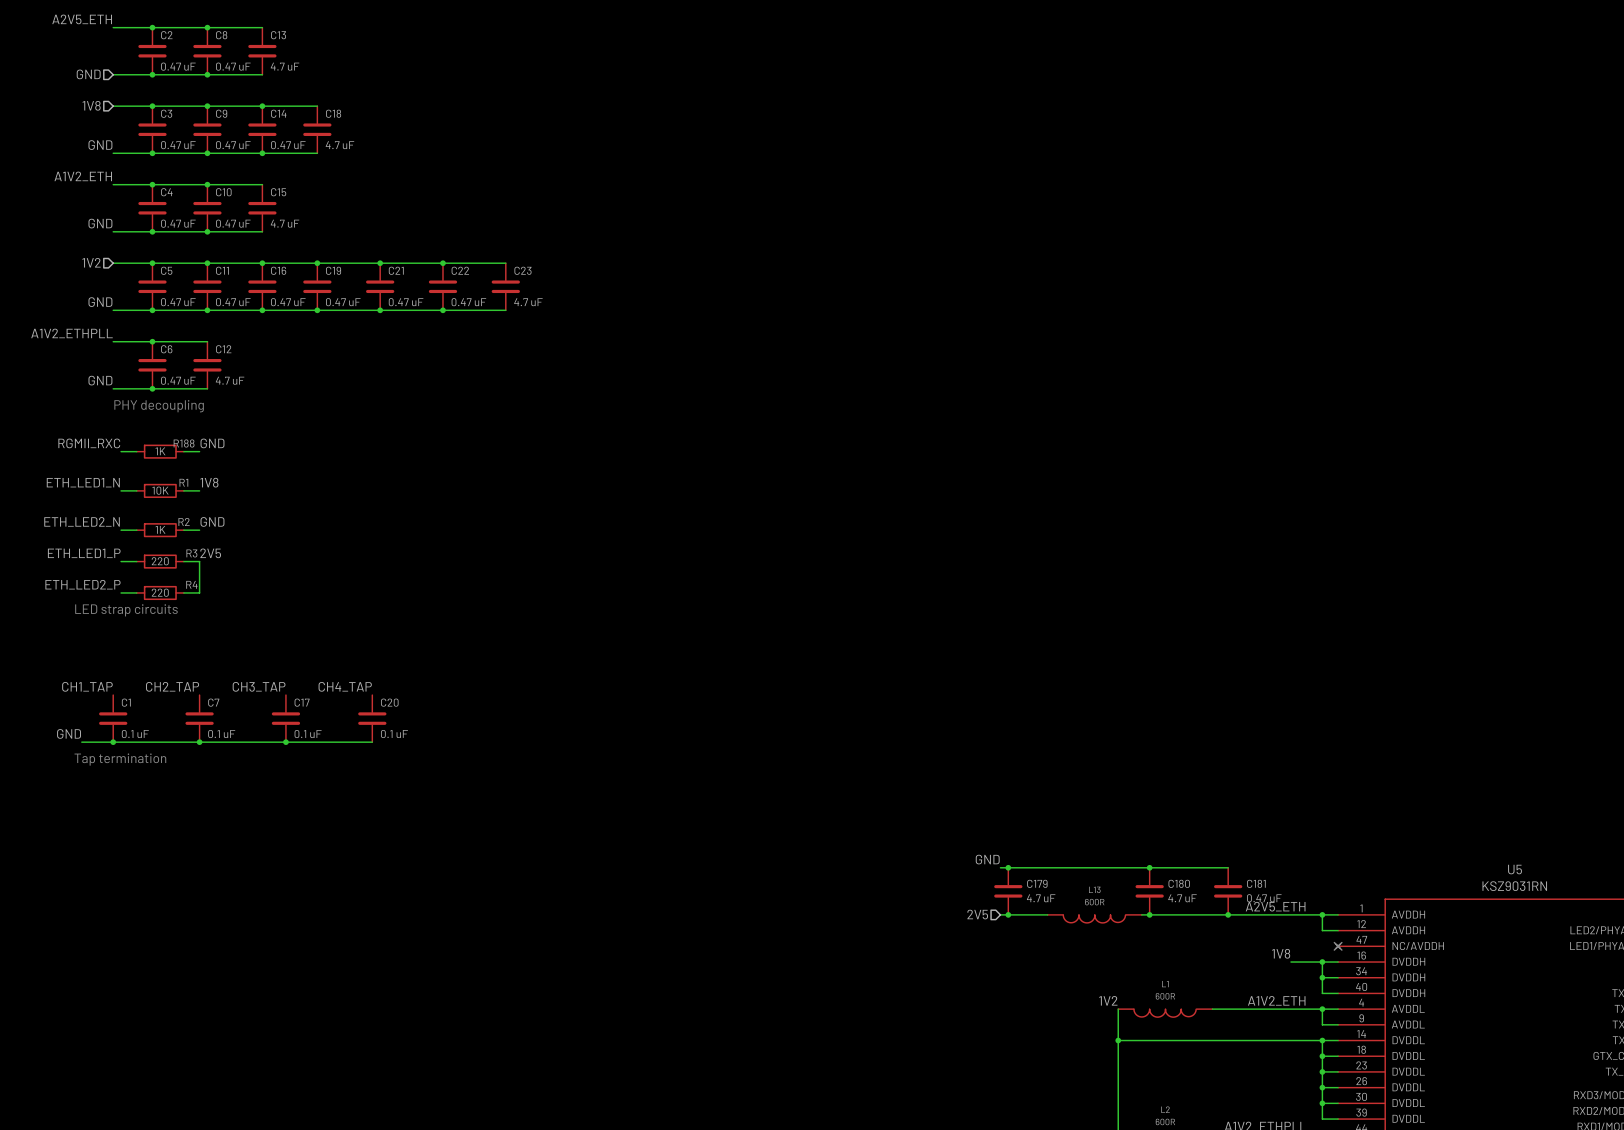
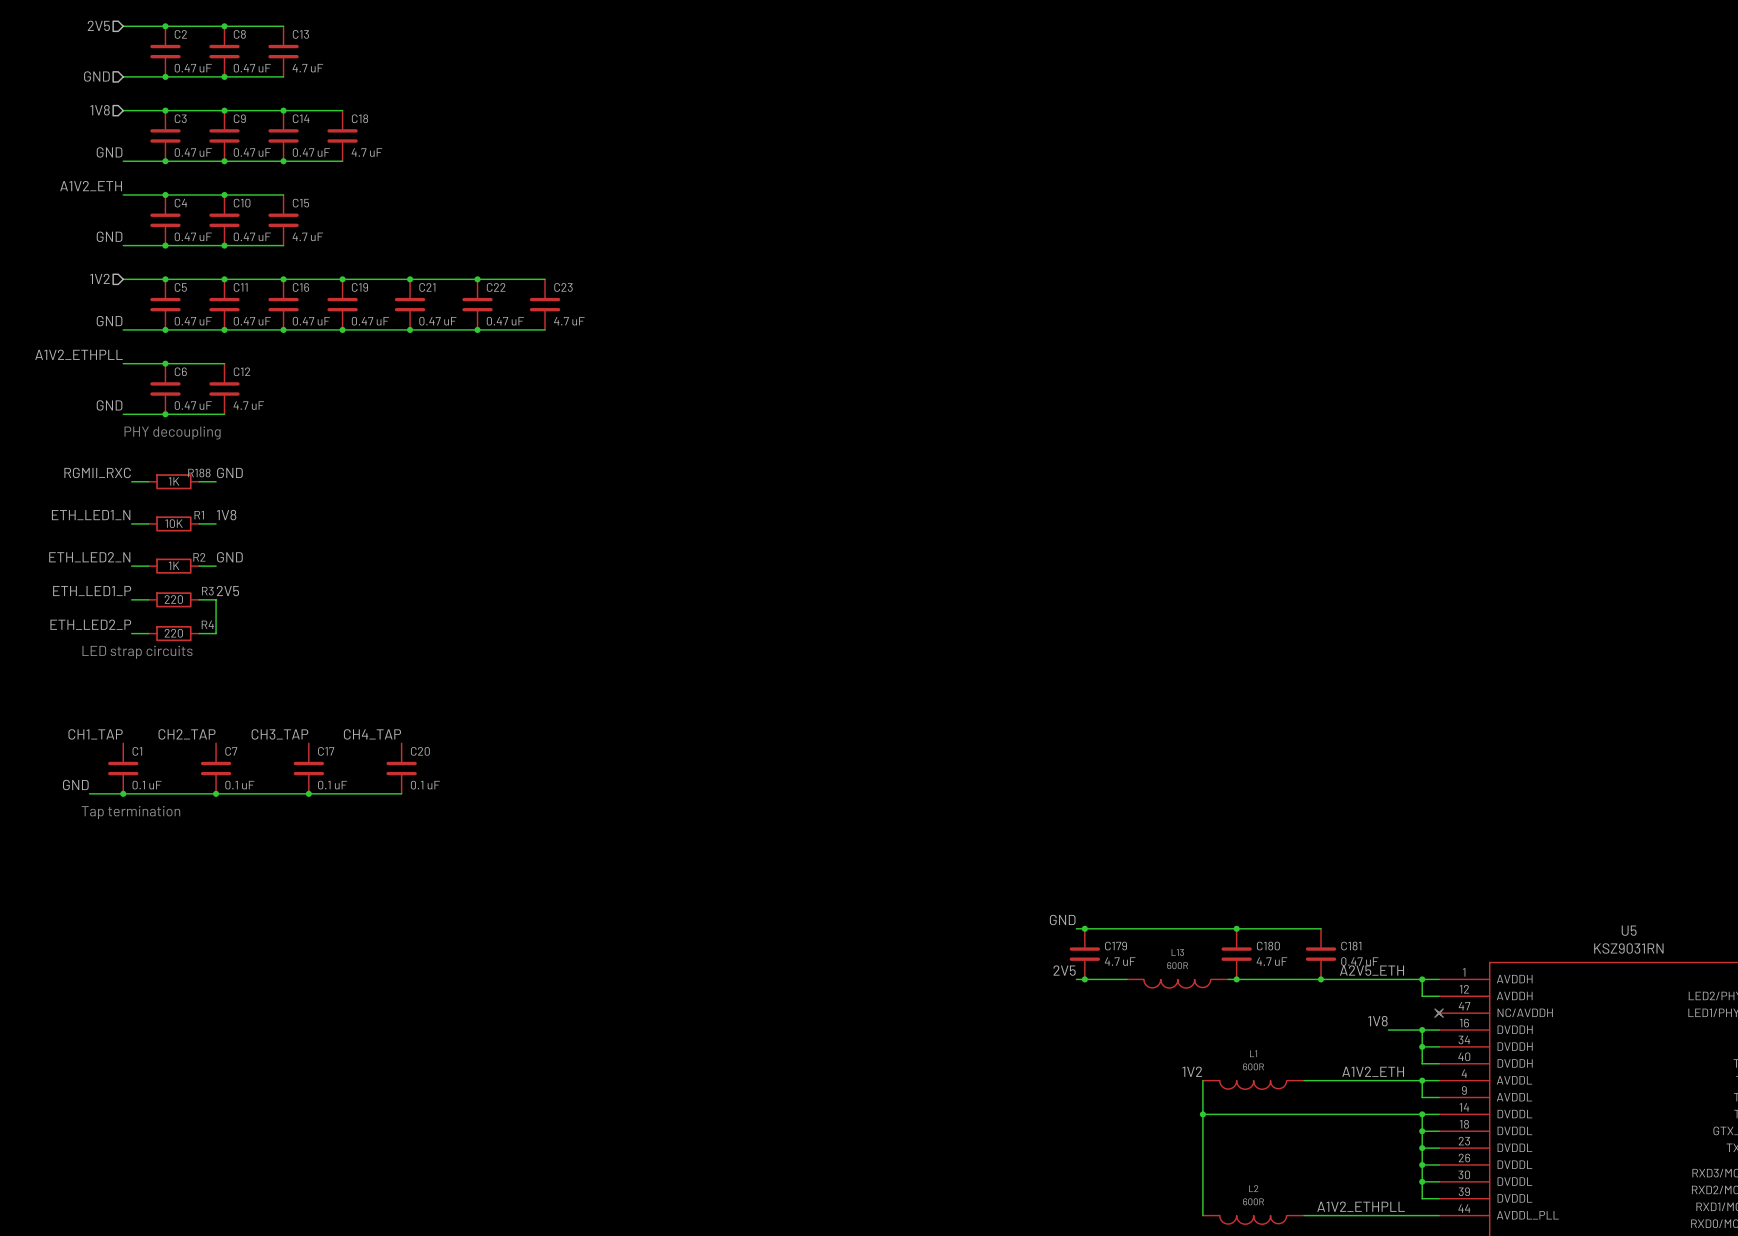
label: A2V5_ETH (82, 19) -> none
hierarchical label: none -> 2V5 (98, 25)
label: none -> 2V5 (1064, 970)
hierarchical label: 2V5 (977, 914) -> none

